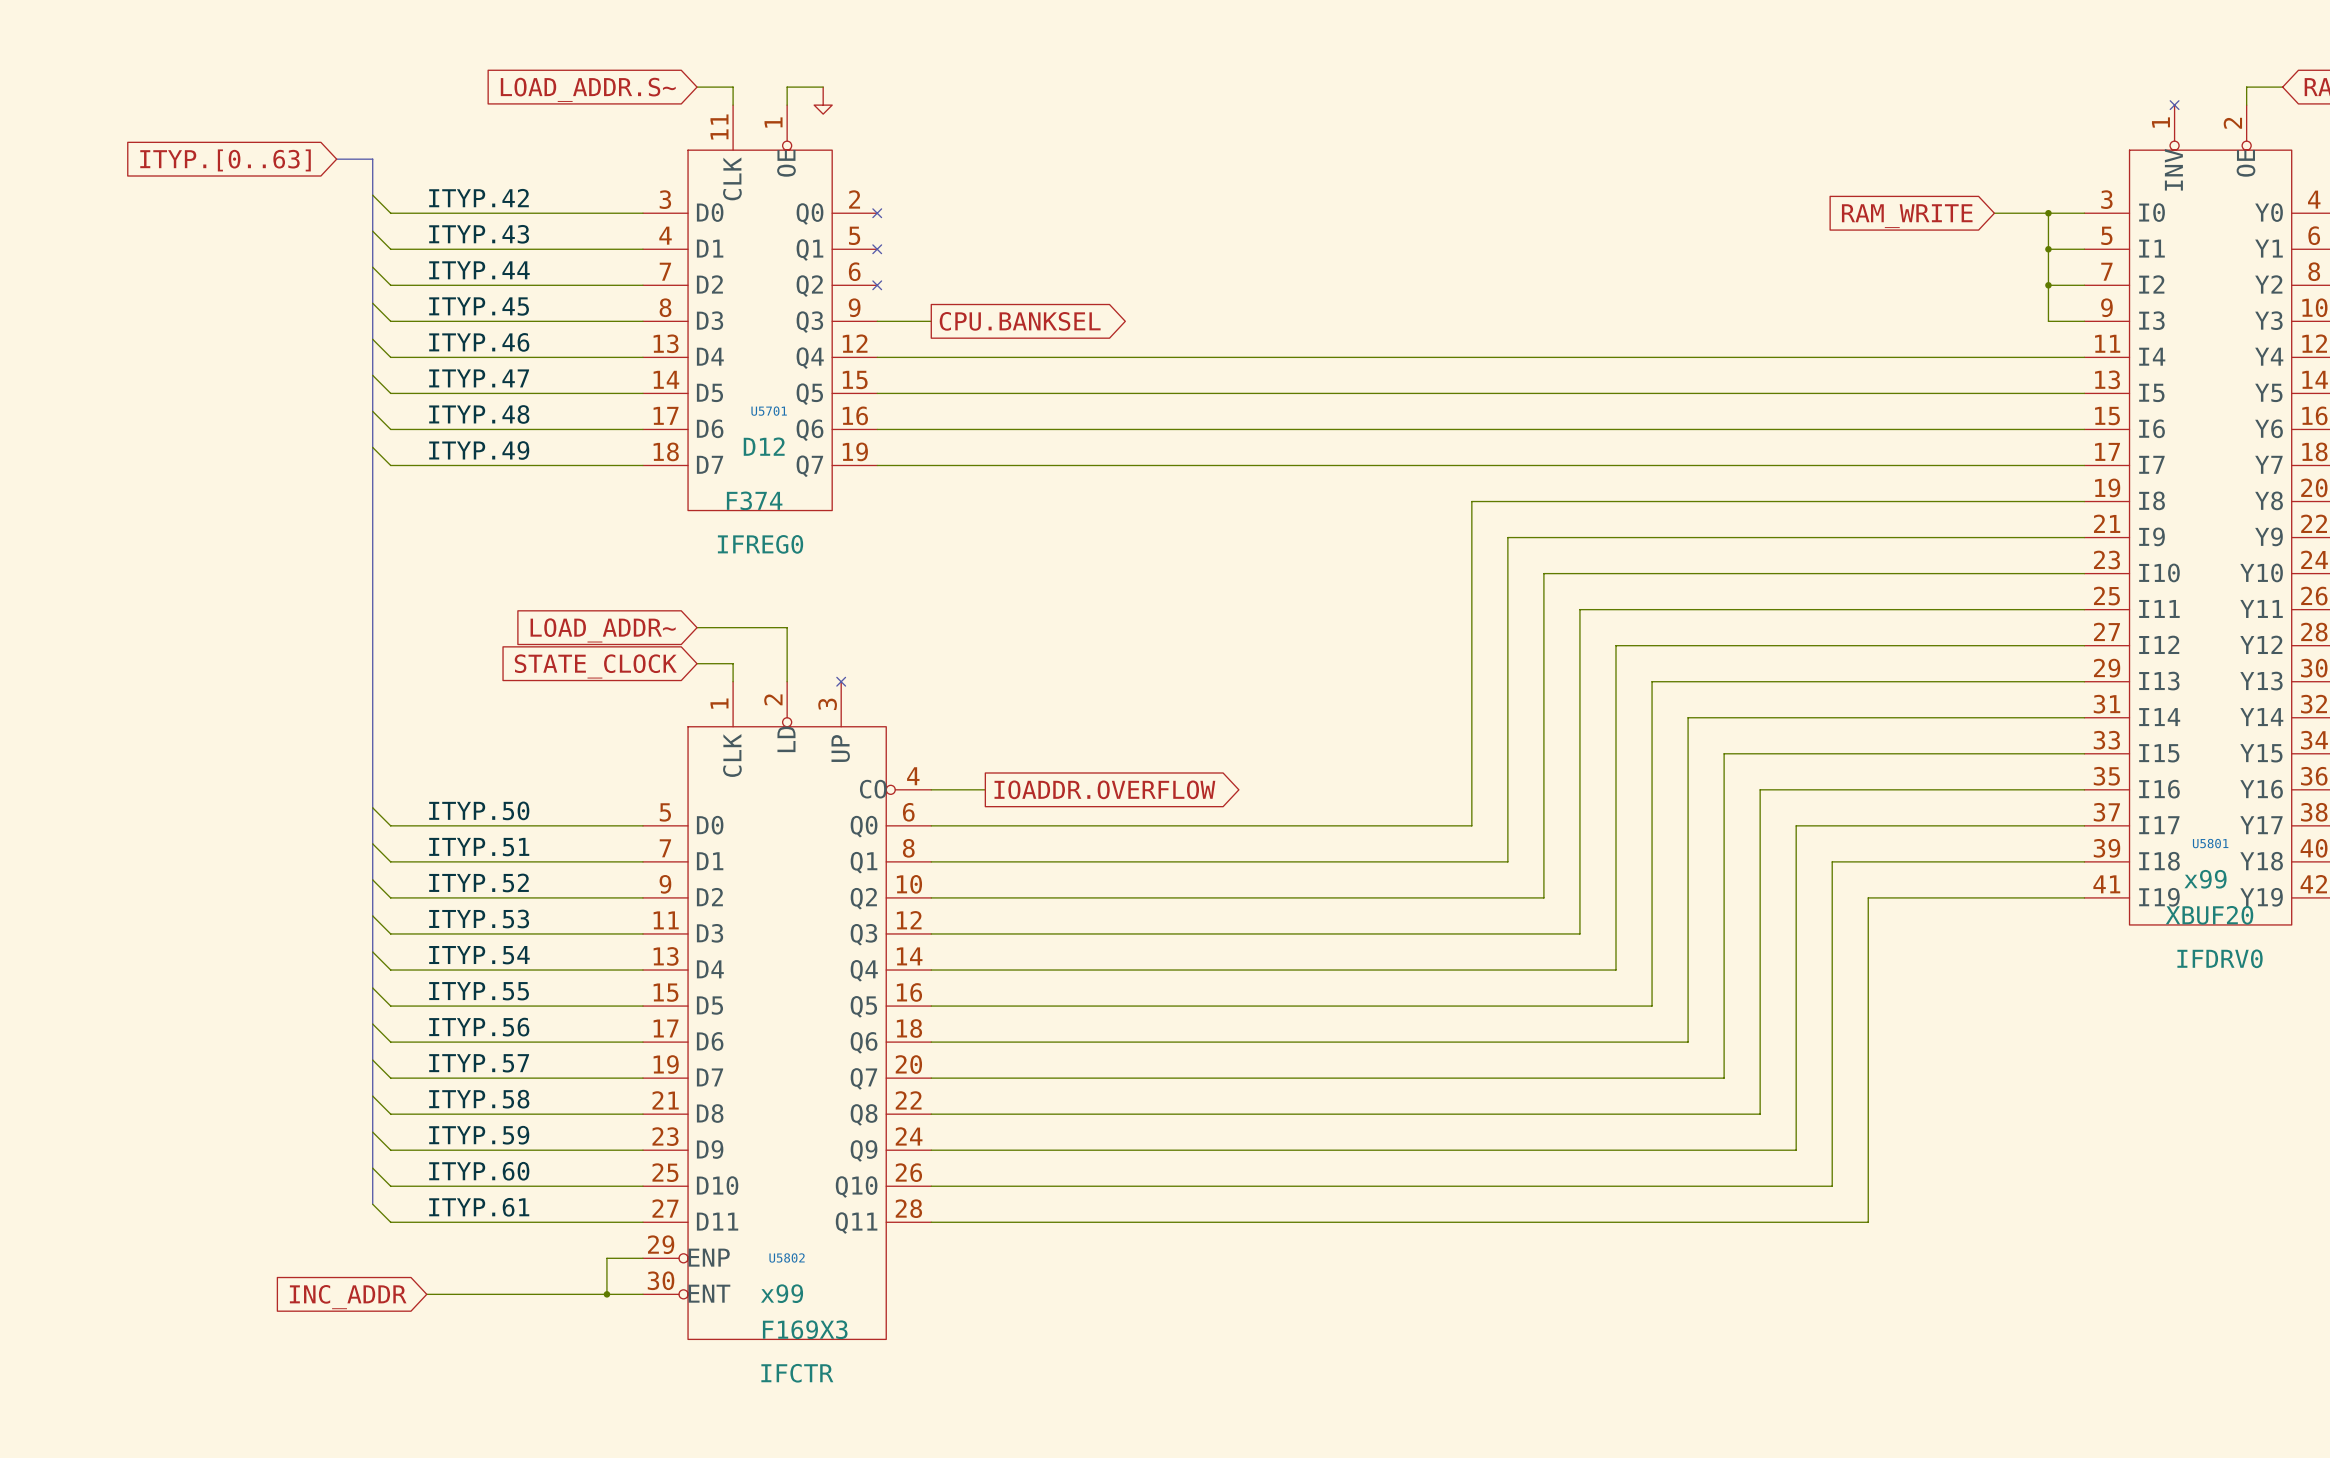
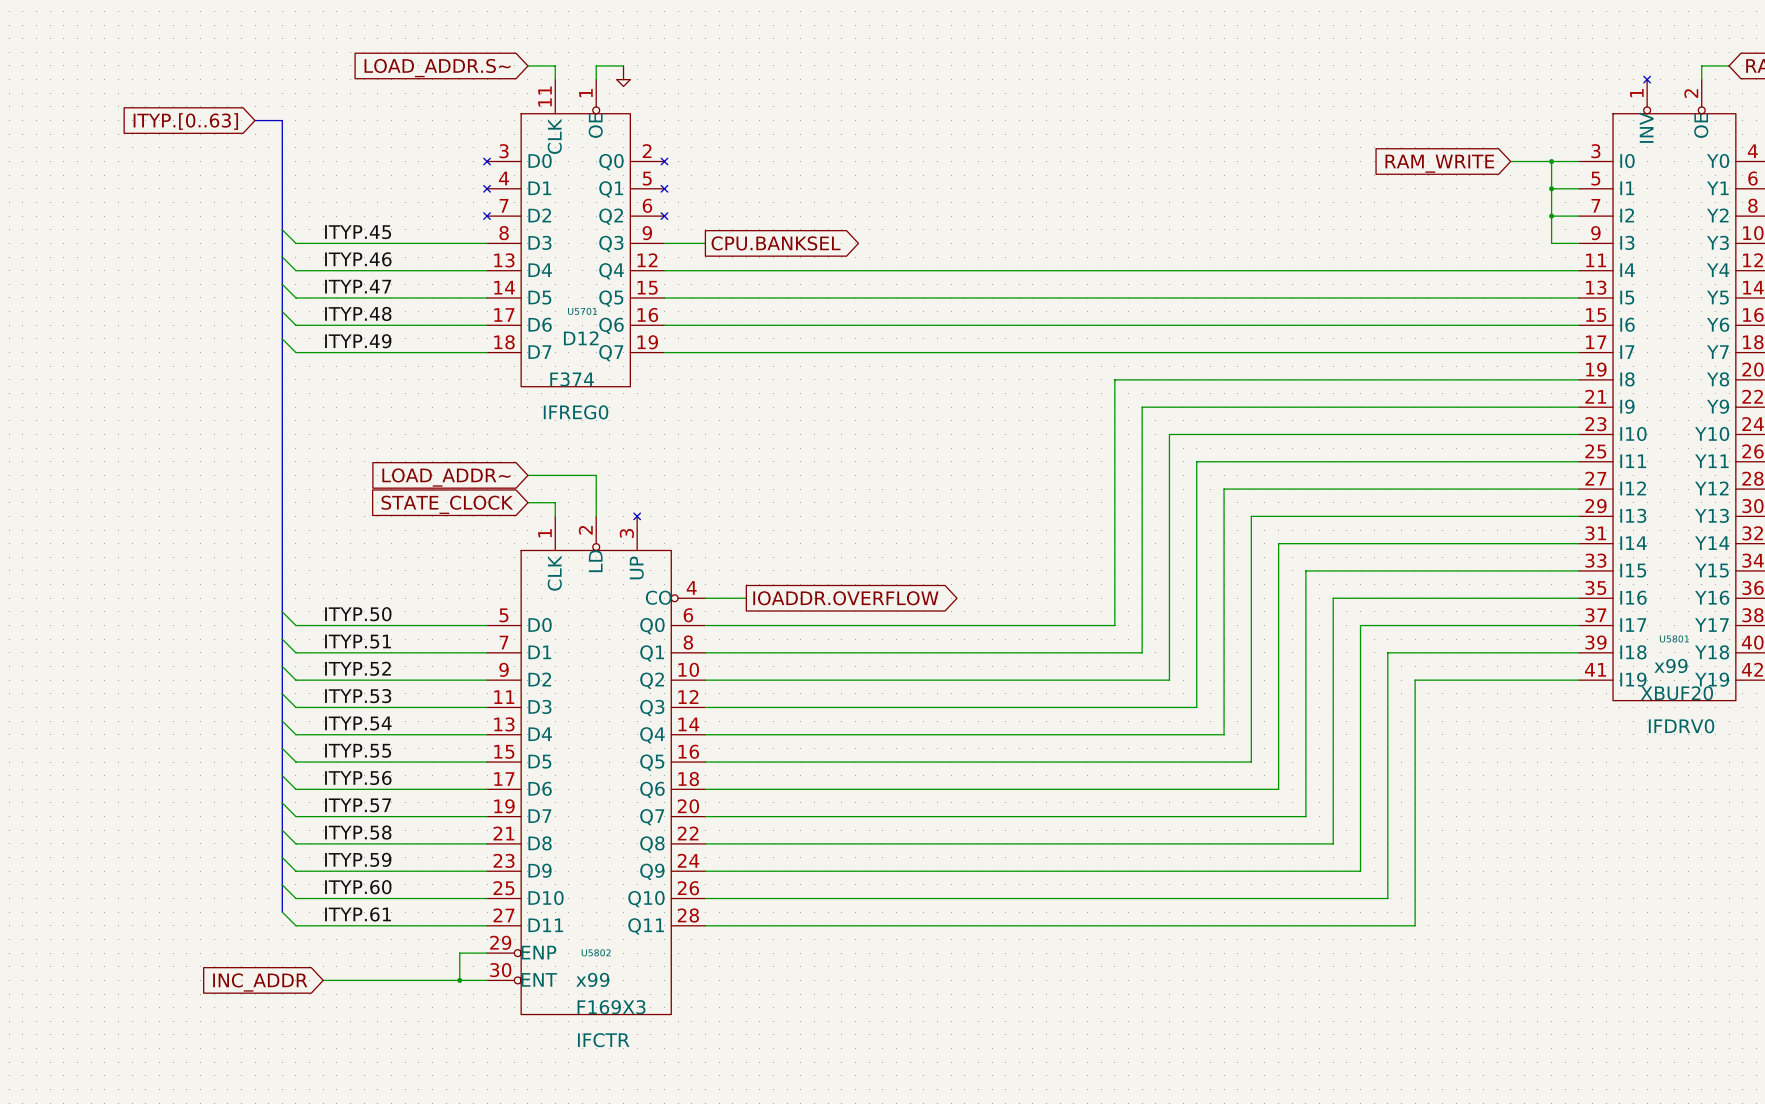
wire: (372, 195) (390, 213) (642, 213) -> none
label: ITYP.42 (479, 198) -> none
no-connect mark: none -> (487, 161)
wire: (372, 231) (390, 249) (642, 249) -> none
label: ITYP.43 (479, 234) -> none
no-connect mark: none -> (487, 188)
wire: (372, 267) (390, 285) (642, 285) -> none
label: ITYP.44 (479, 270) -> none
no-connect mark: none -> (487, 216)

